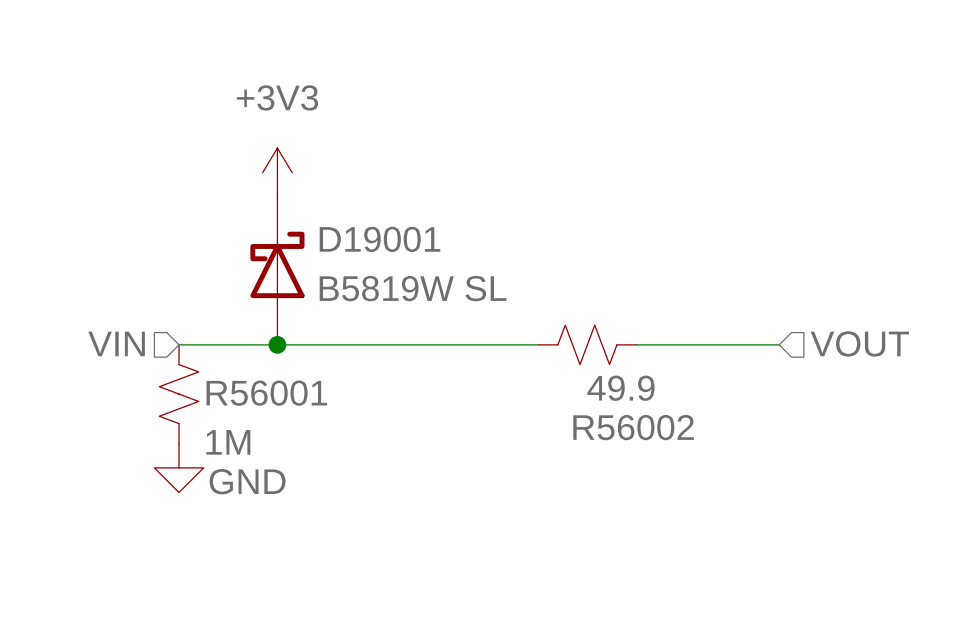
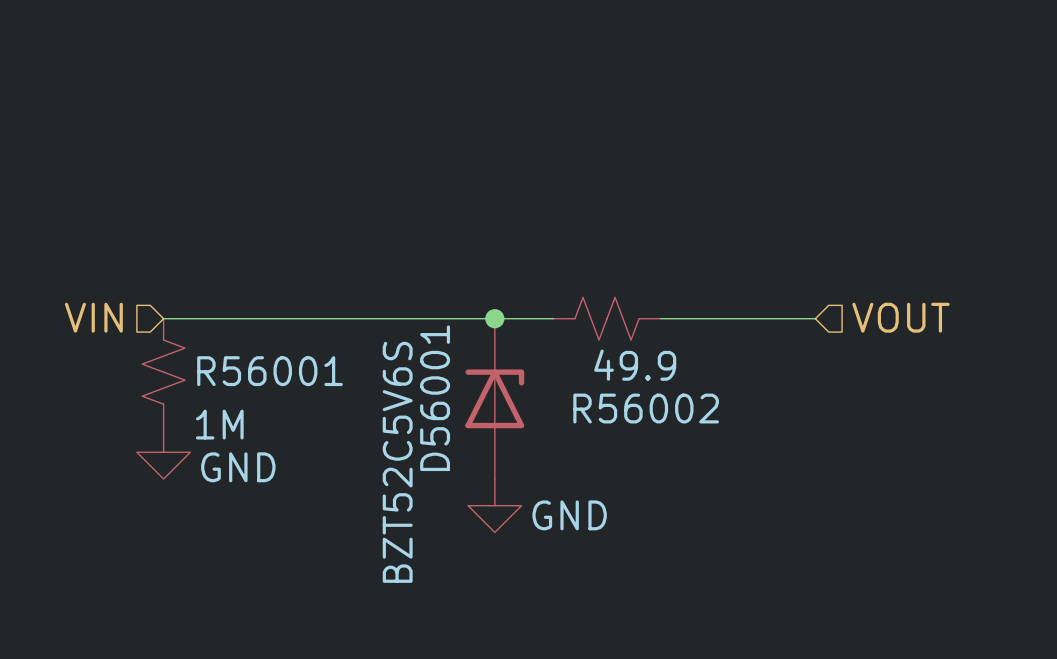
power symbol: +3V3 (277, 172) -> none
D19001: B5819W SL (277, 271) -> none
junction: (277, 344) -> none
junction: none -> (494, 318)
D56001: none -> BZT52C5V6S (494, 398)
power symbol: none -> GND (494, 505)

